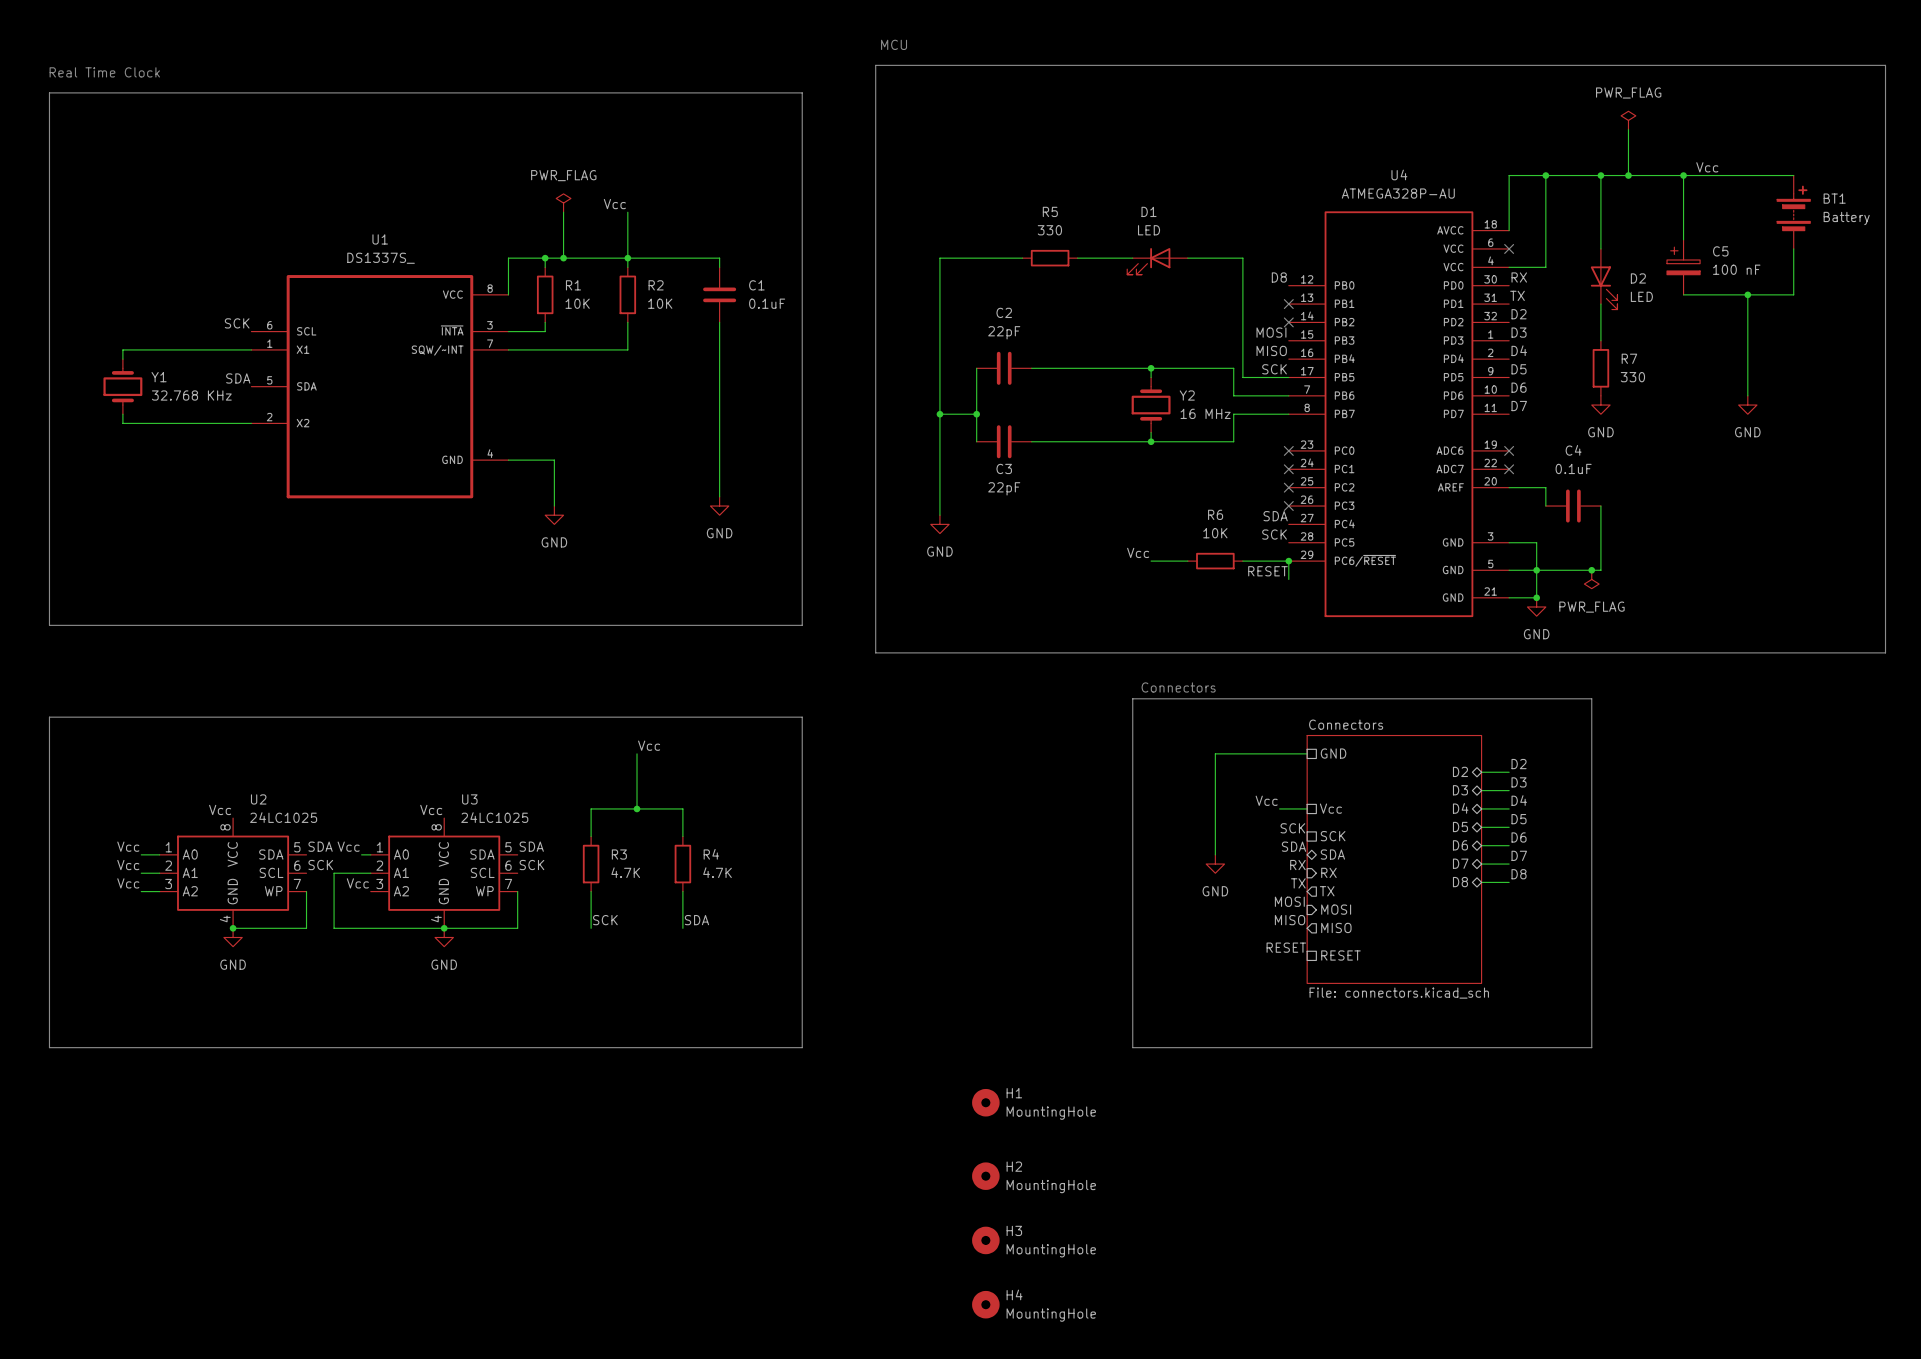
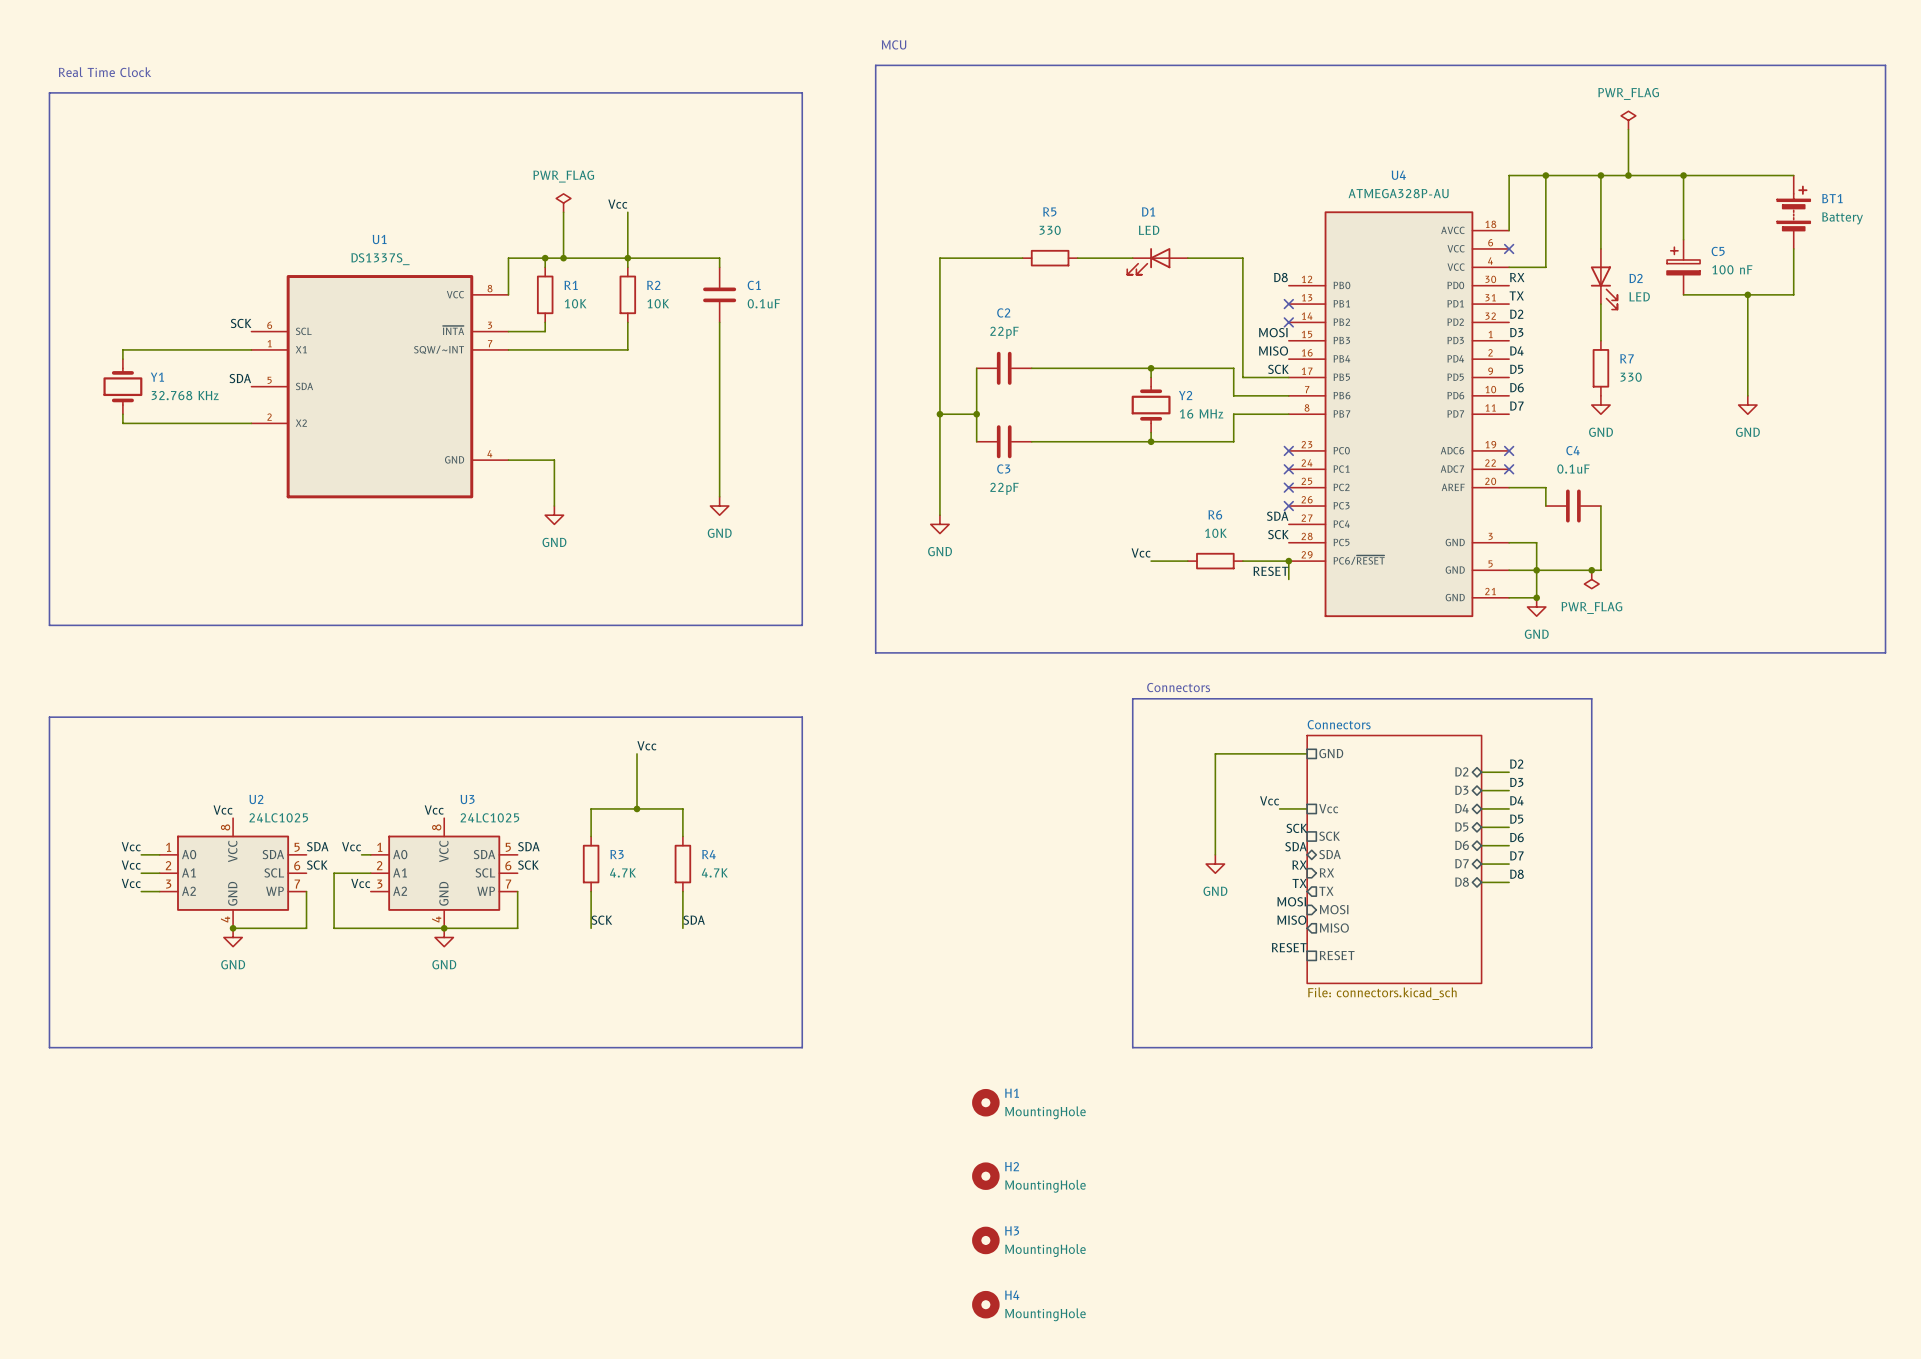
label: Vcc (1707, 167) -> none

